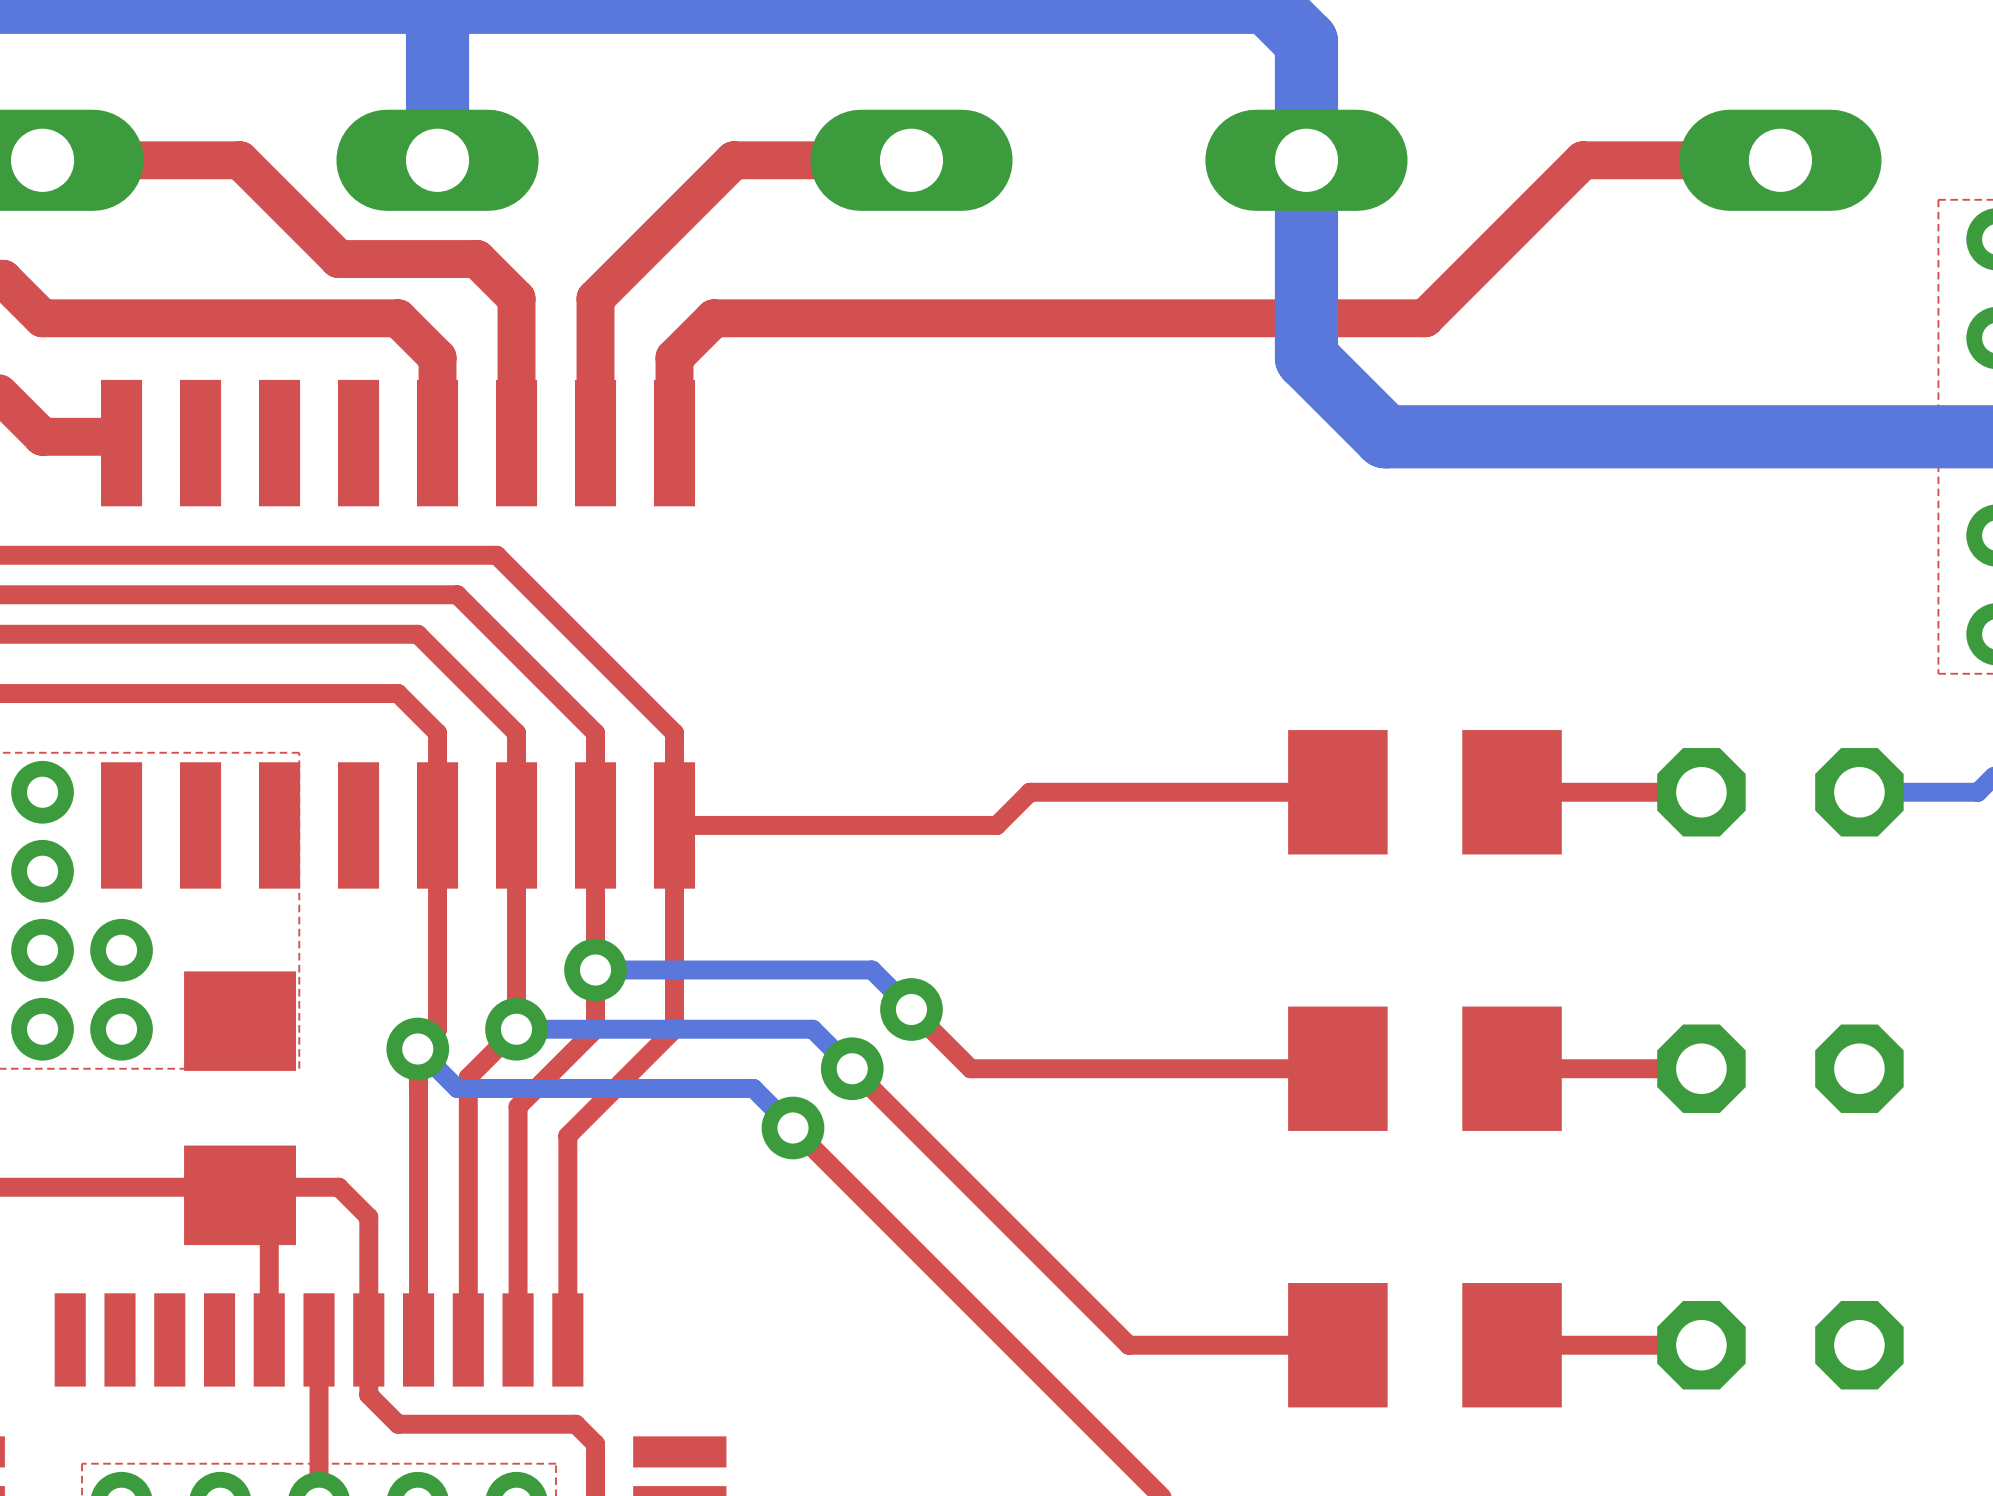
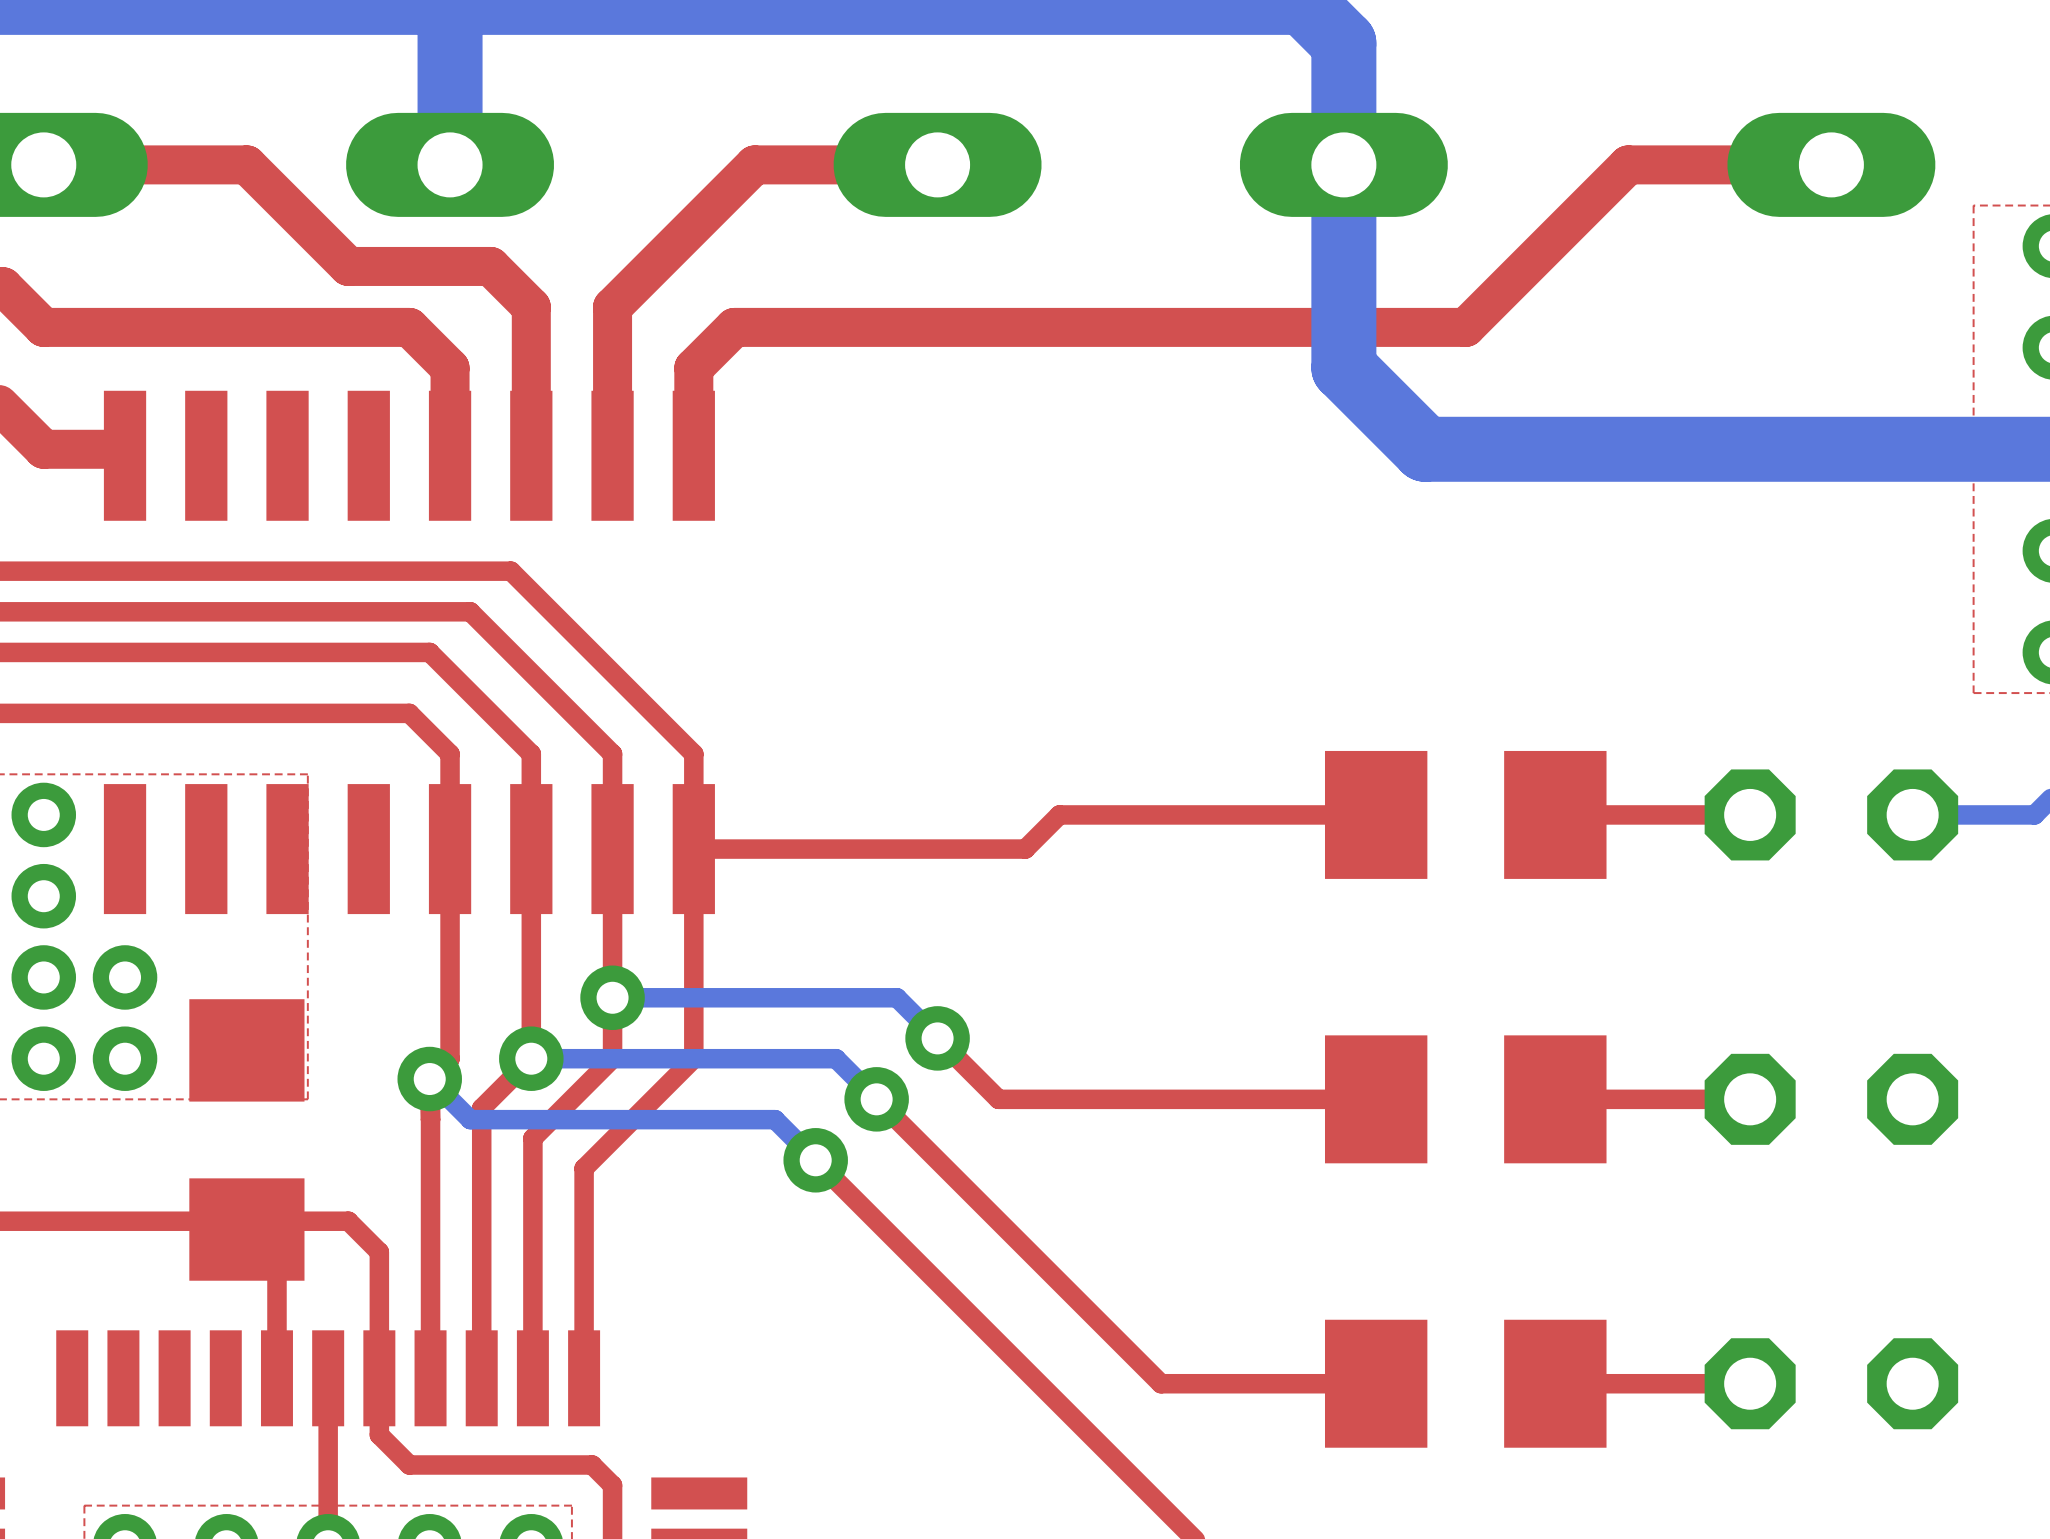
top zone outline: (1938, 199) (1938, 673) -> (1993, 205) (1973, 205) (1973, 693) (1993, 693)

